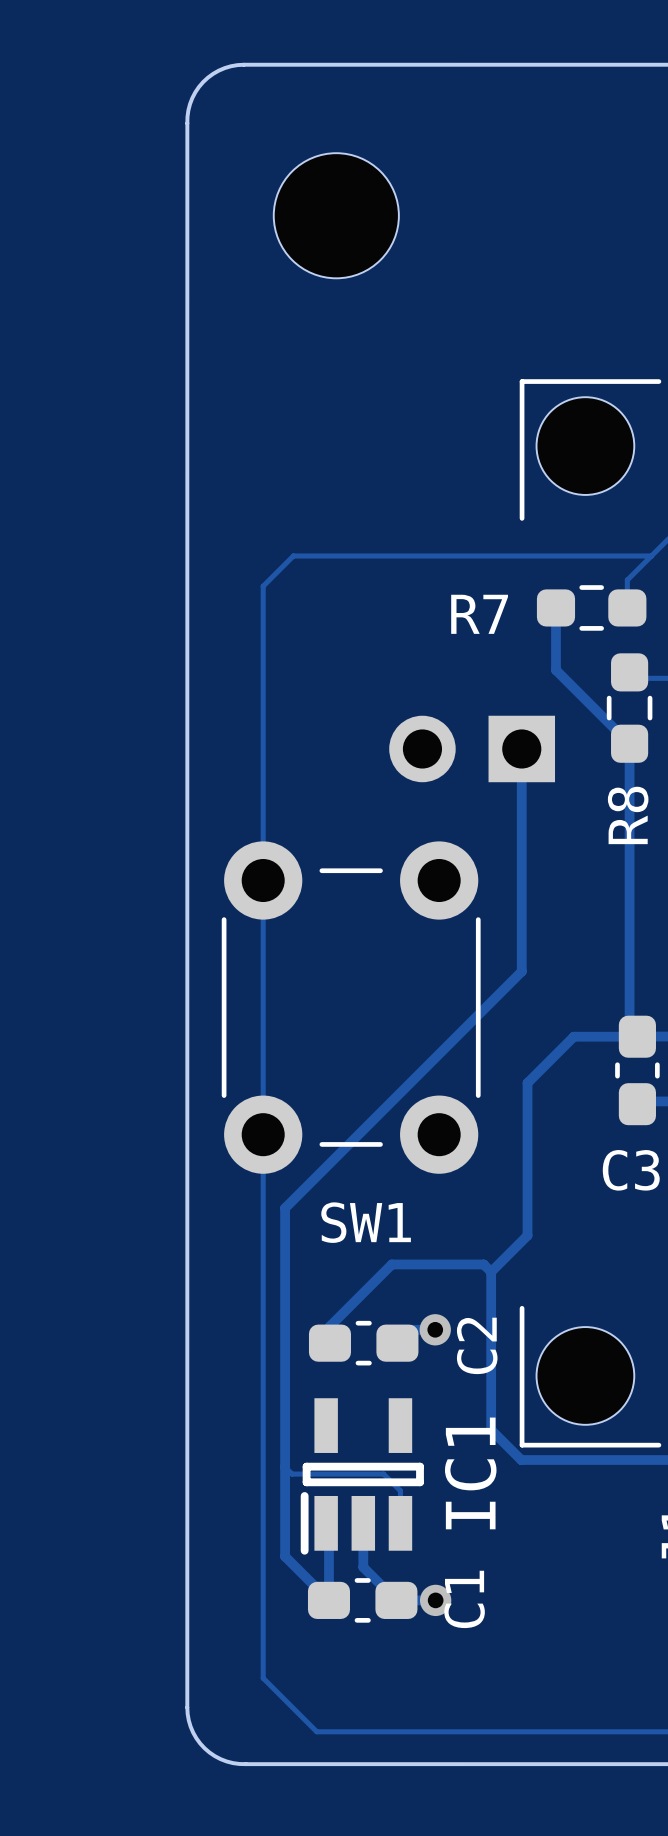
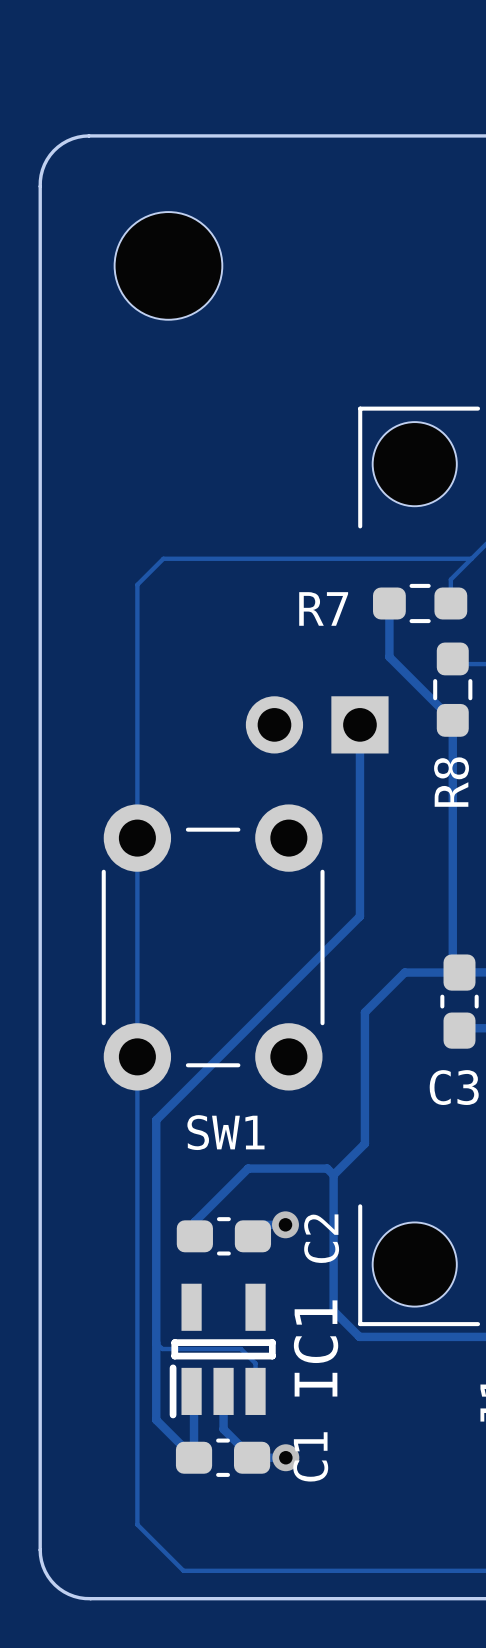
board edge: (243, 64) (224, 68) (207, 77) (192, 98) (187, 116) (187, 1707) (190, 1726) (204, 1748) (220, 1759) (245, 1764) -> (120, 135) (83, 136) (67, 140) (50, 155) (42, 169) (40, 180) (40, 1549) (43, 1566) (48, 1576) (63, 1591) (85, 1598) (122, 1598)
part position: (336, 215) -> (168, 265)

